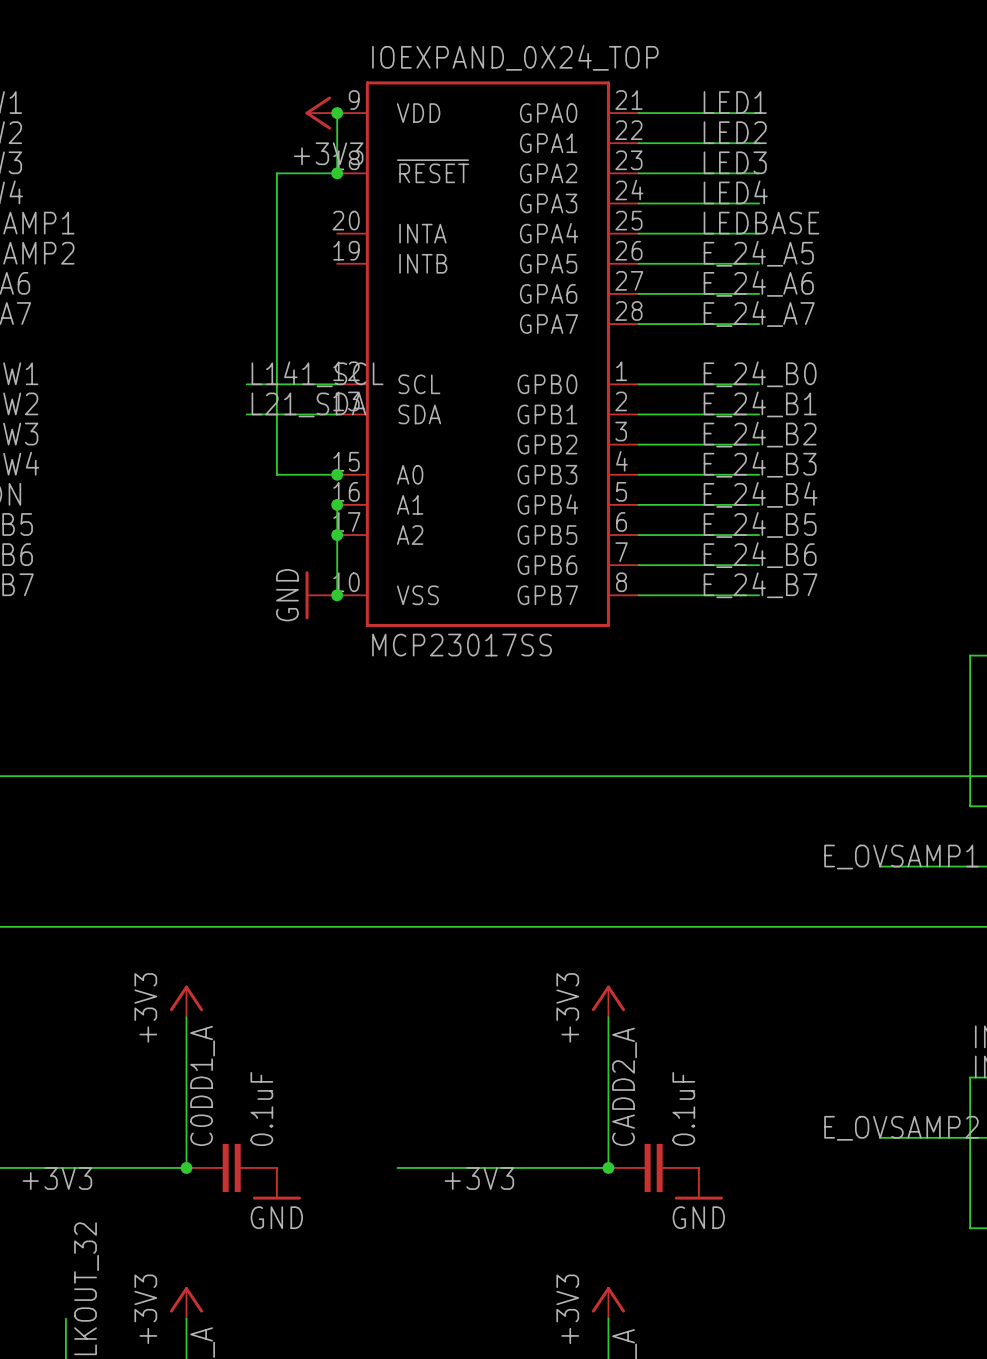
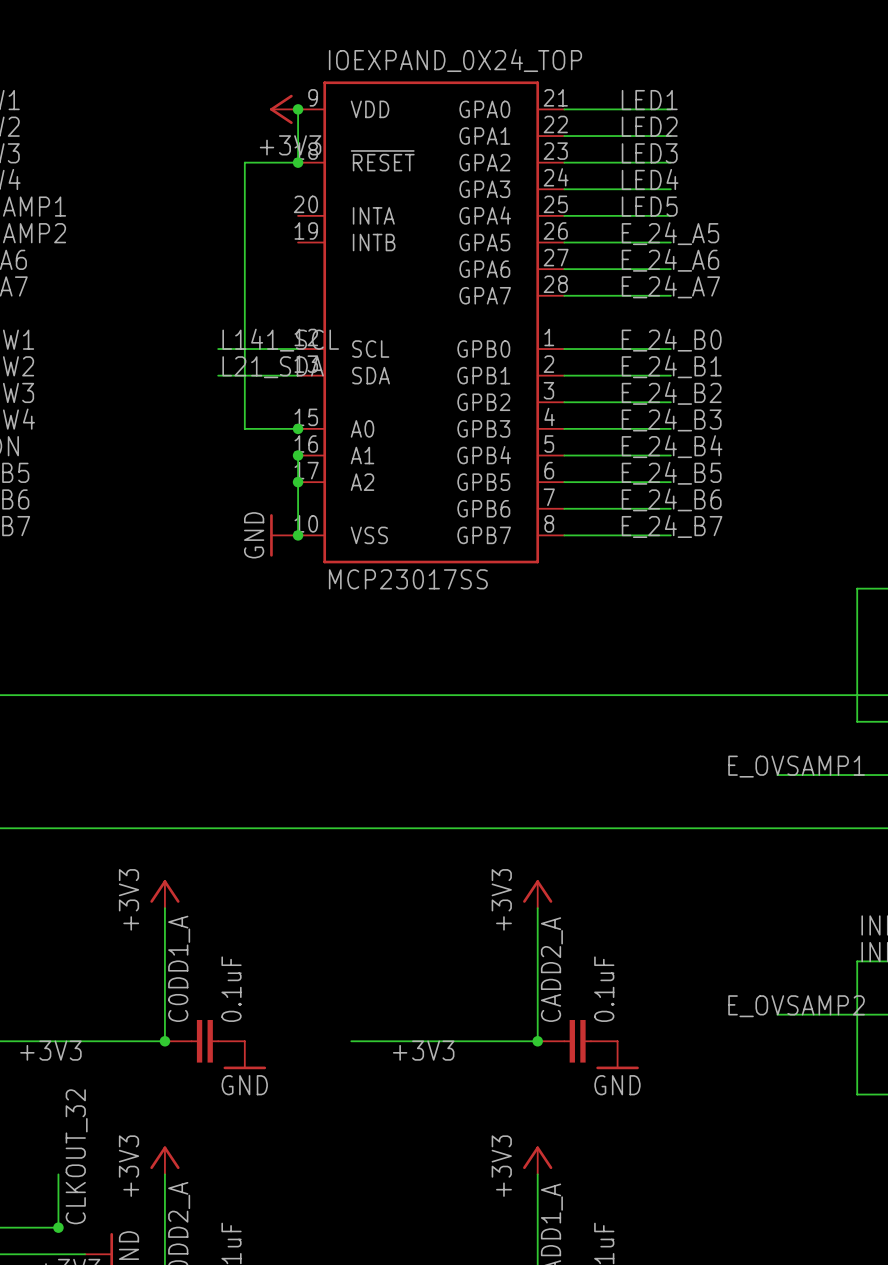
label: LEDBASE (761, 223) -> LED5 (649, 206)

